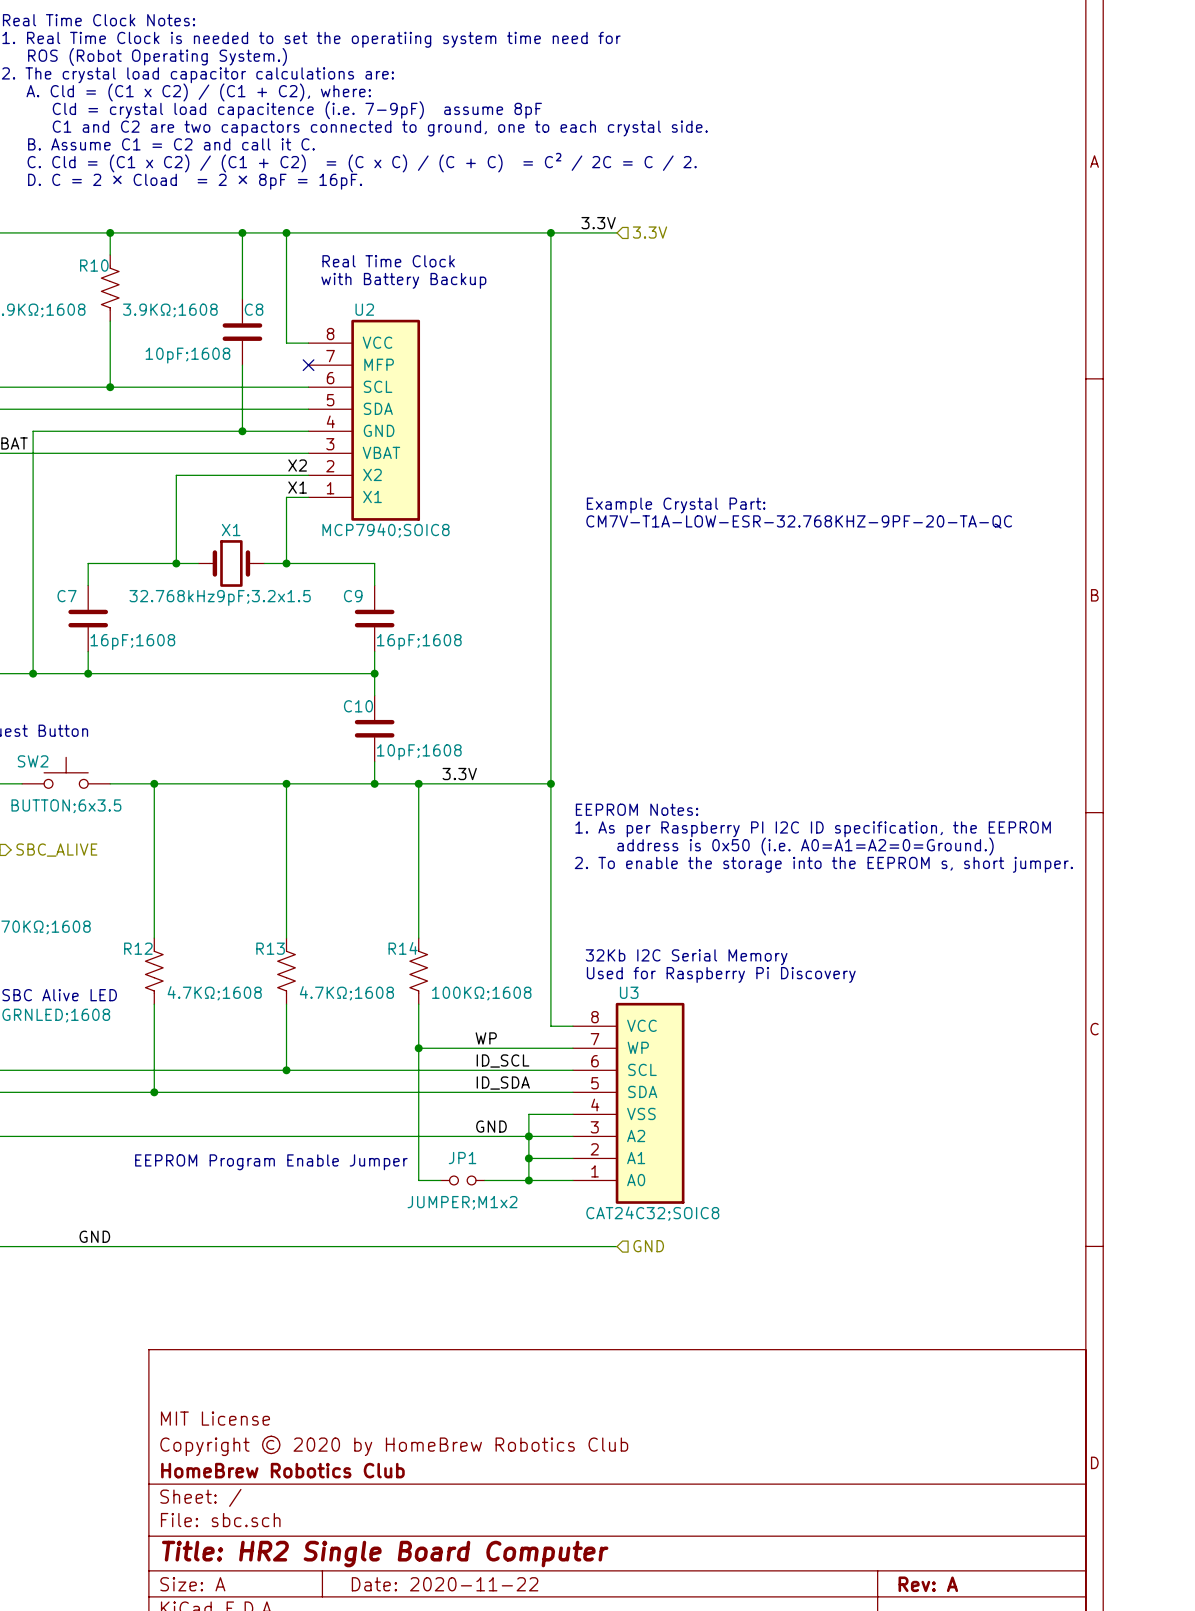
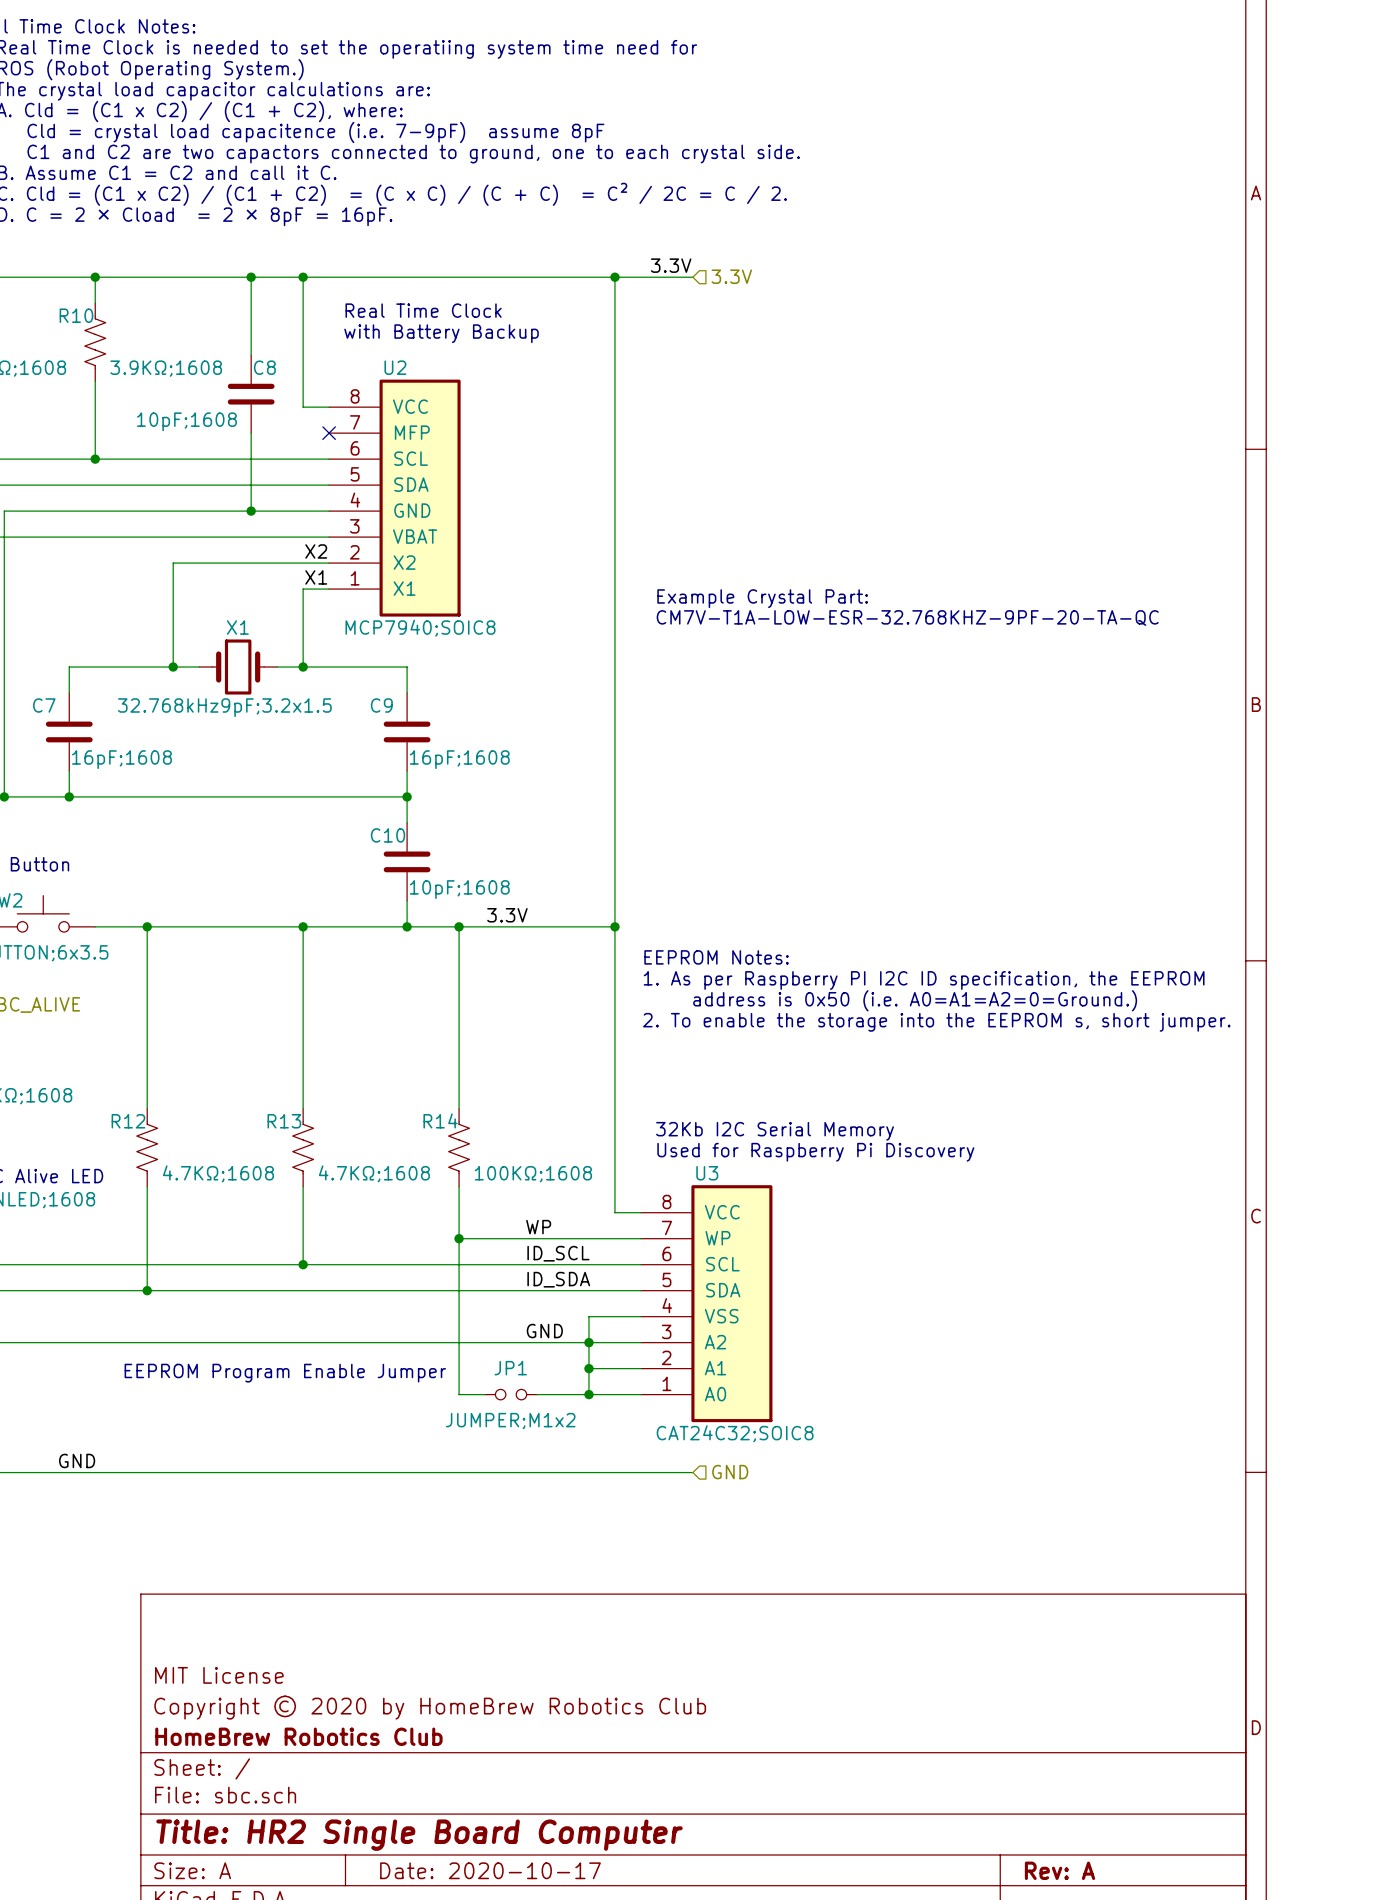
title block: Date: 2020-11-22 (445, 1584) -> Date: 2020-10-17 (490, 1870)

